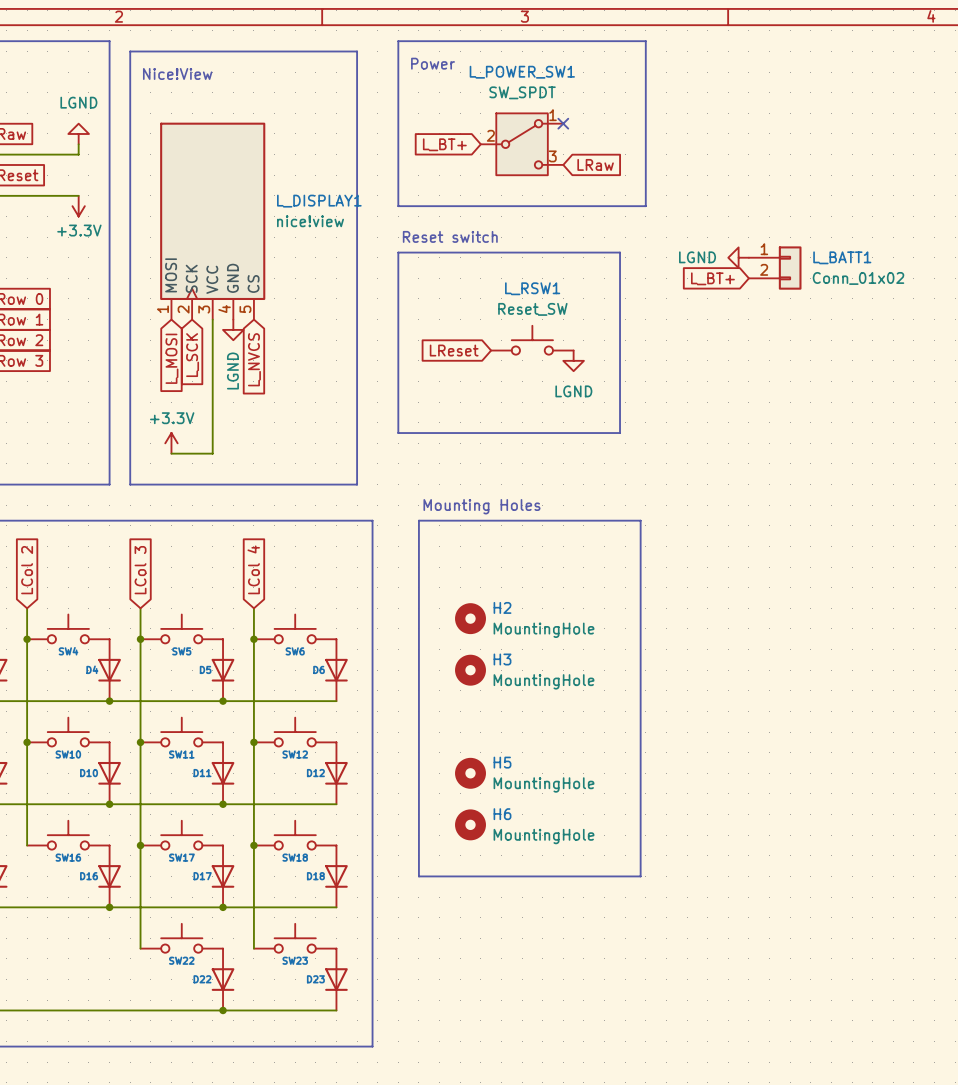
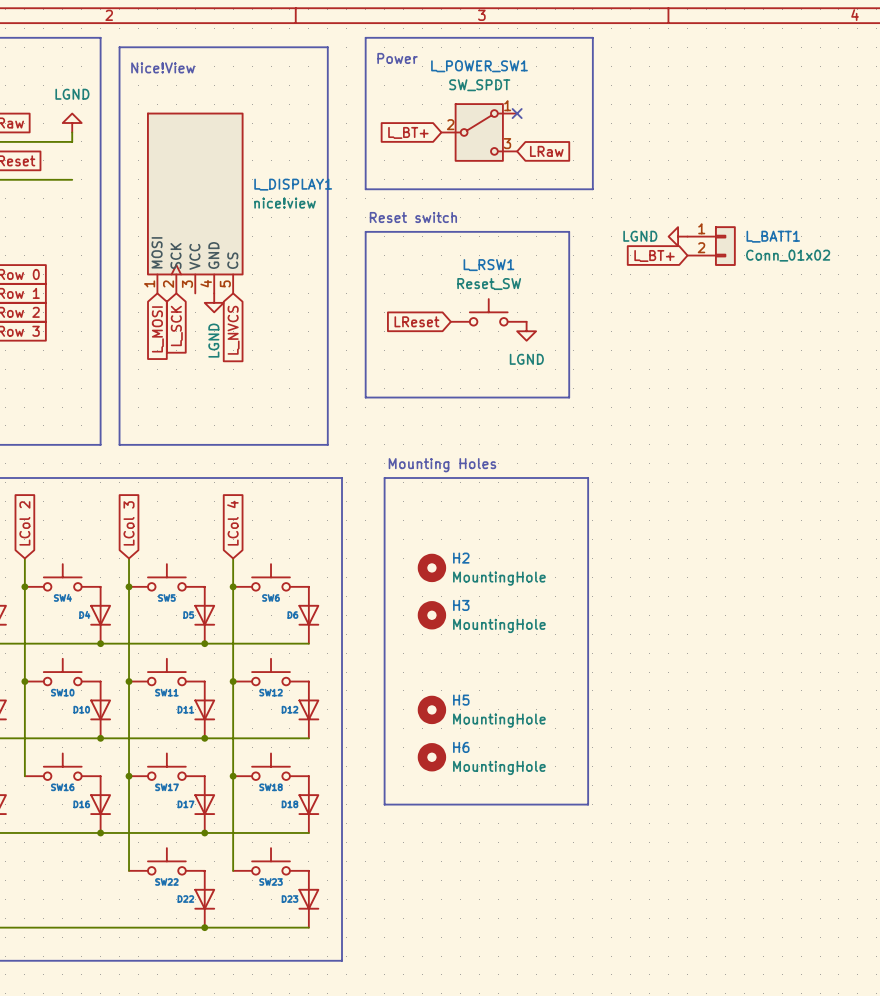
power symbol: +3.3V (78, 206) -> none
wire: (212, 319) (212, 453) (171, 453) -> none
power symbol: +3.3V (171, 443) -> none

